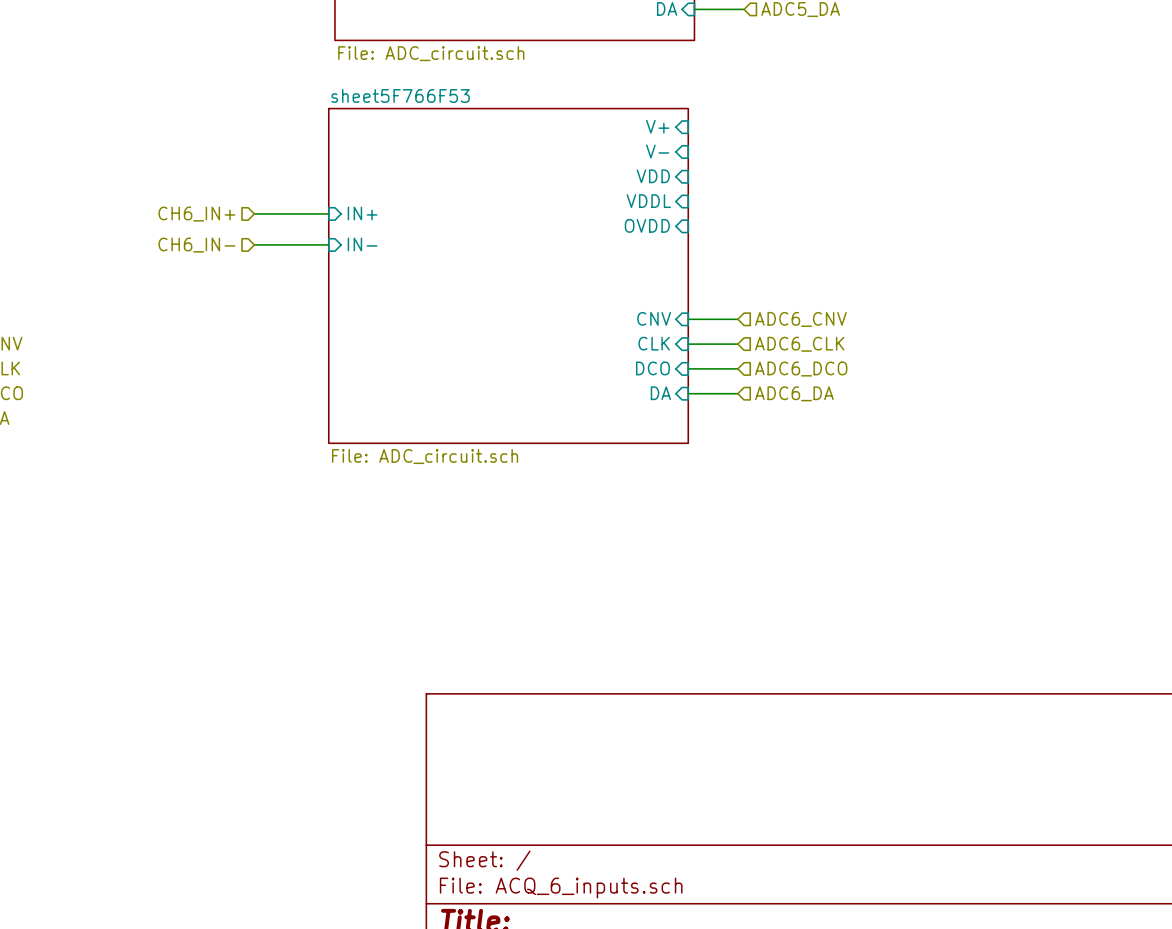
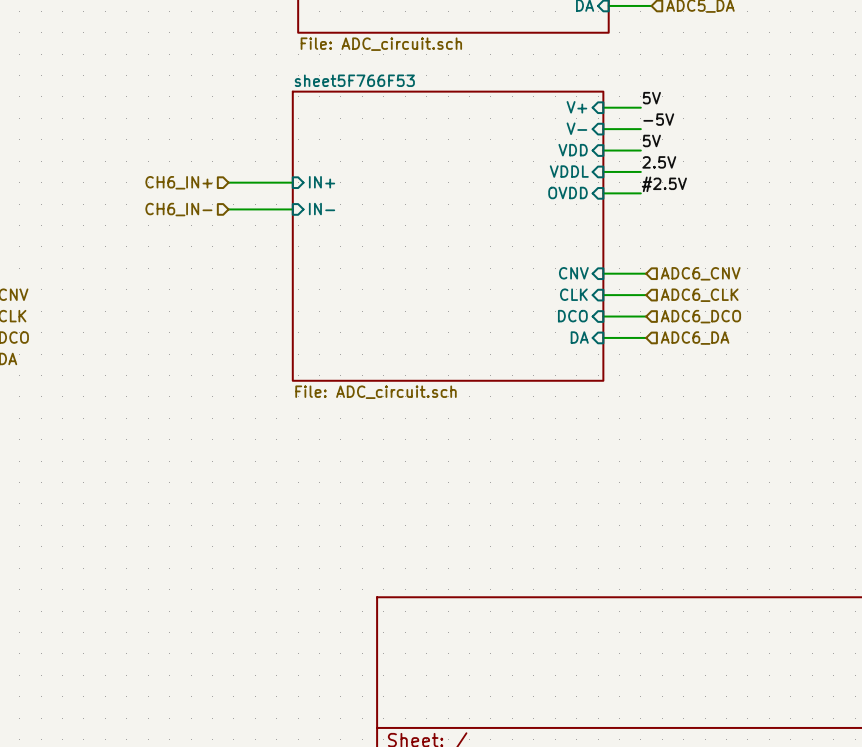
label: none -> 5V (651, 98)
wire: none -> (603, 107) (640, 107)
label: none -> -5V (658, 119)
wire: none -> (603, 129) (640, 129)
label: none -> 5V (651, 140)
wire: none -> (603, 150) (640, 150)
label: none -> 2.5V (659, 162)
wire: none -> (603, 171) (640, 171)
label: none -> #2.5V (664, 184)
wire: none -> (603, 193) (640, 193)

